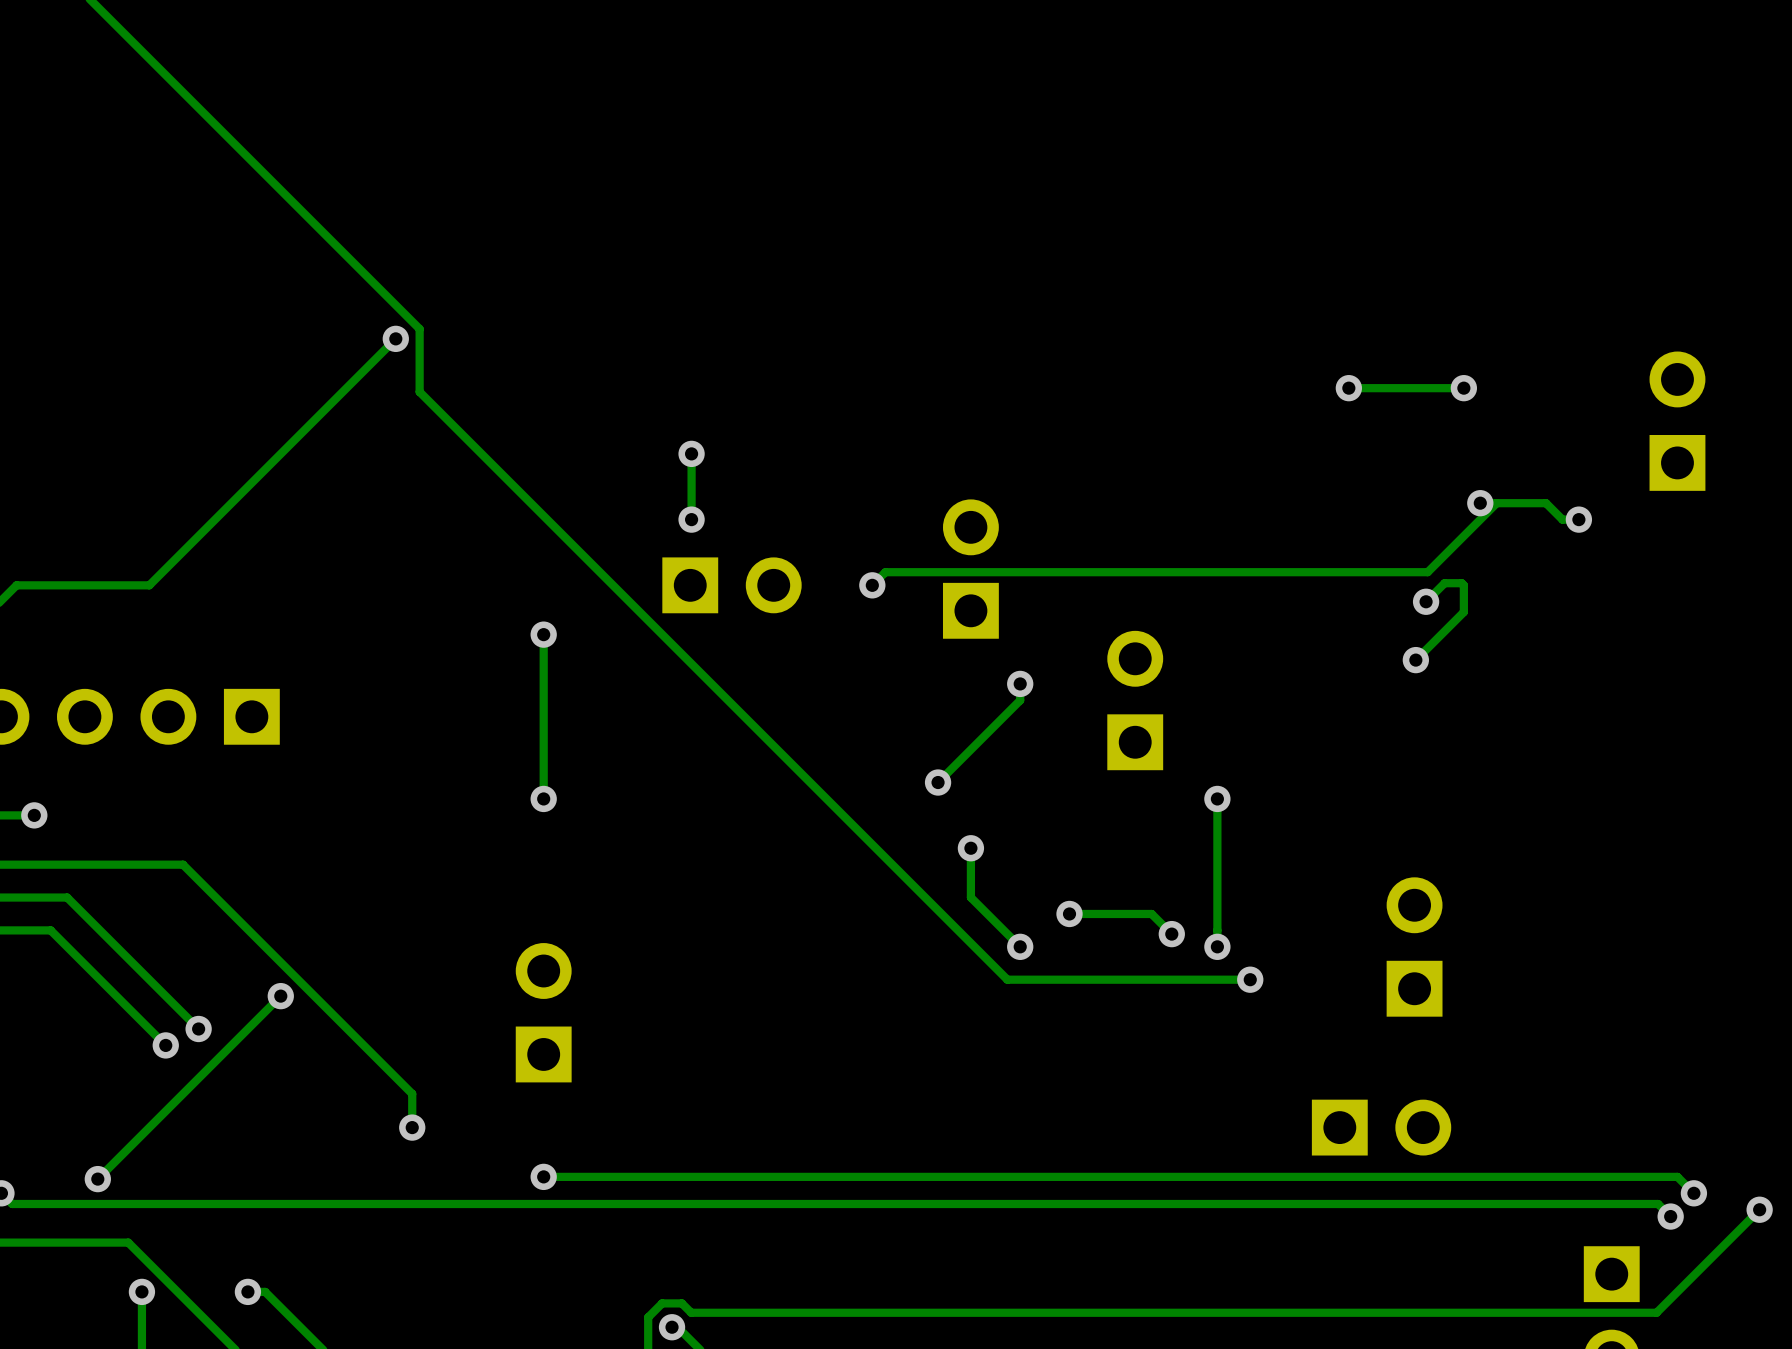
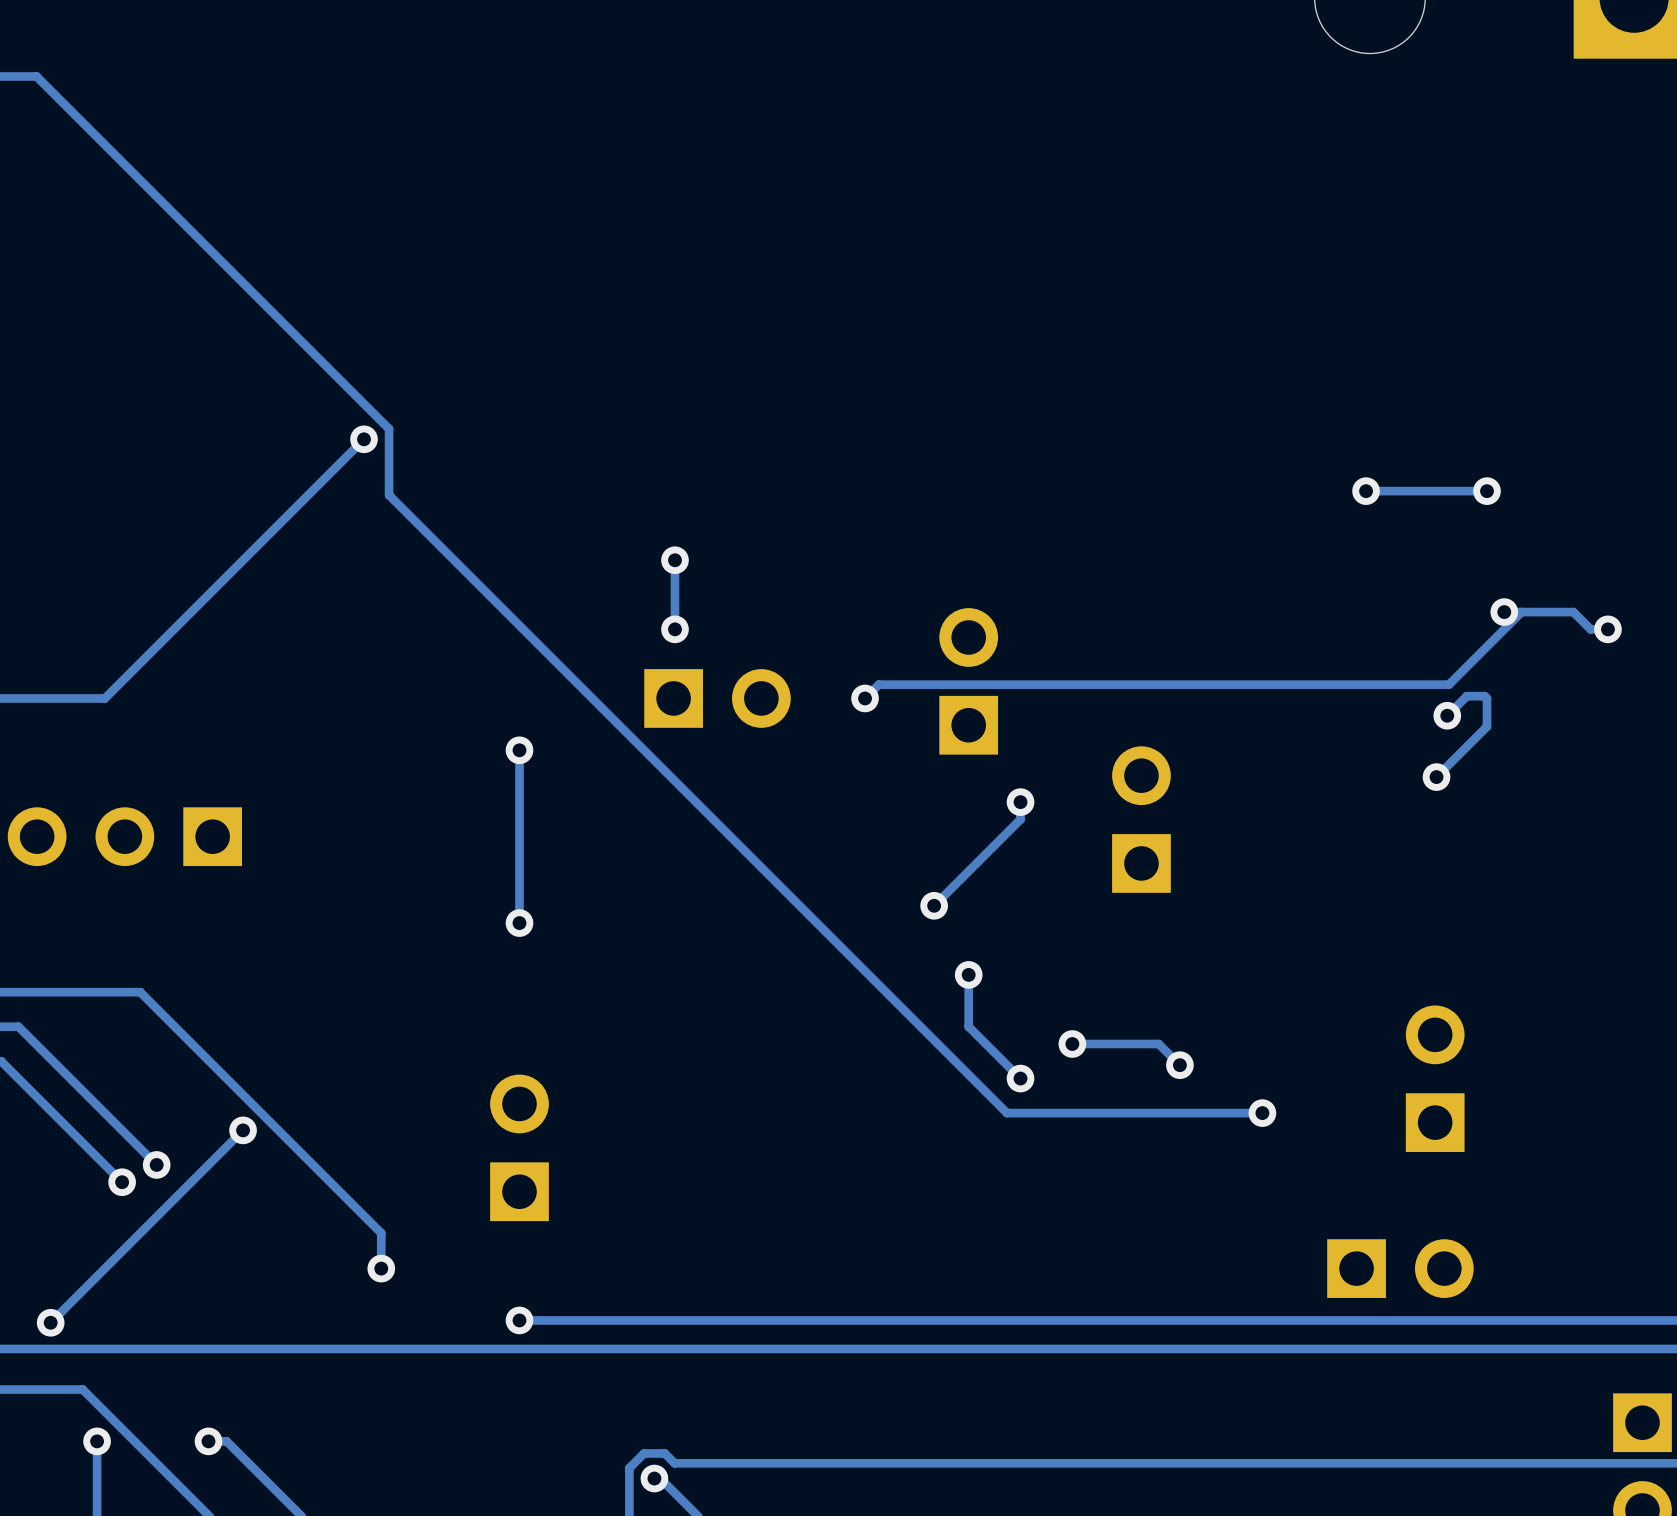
track: (1217, 798) (1217, 946) -> none
via: (1217, 798) -> none
via: (1217, 946) -> none

